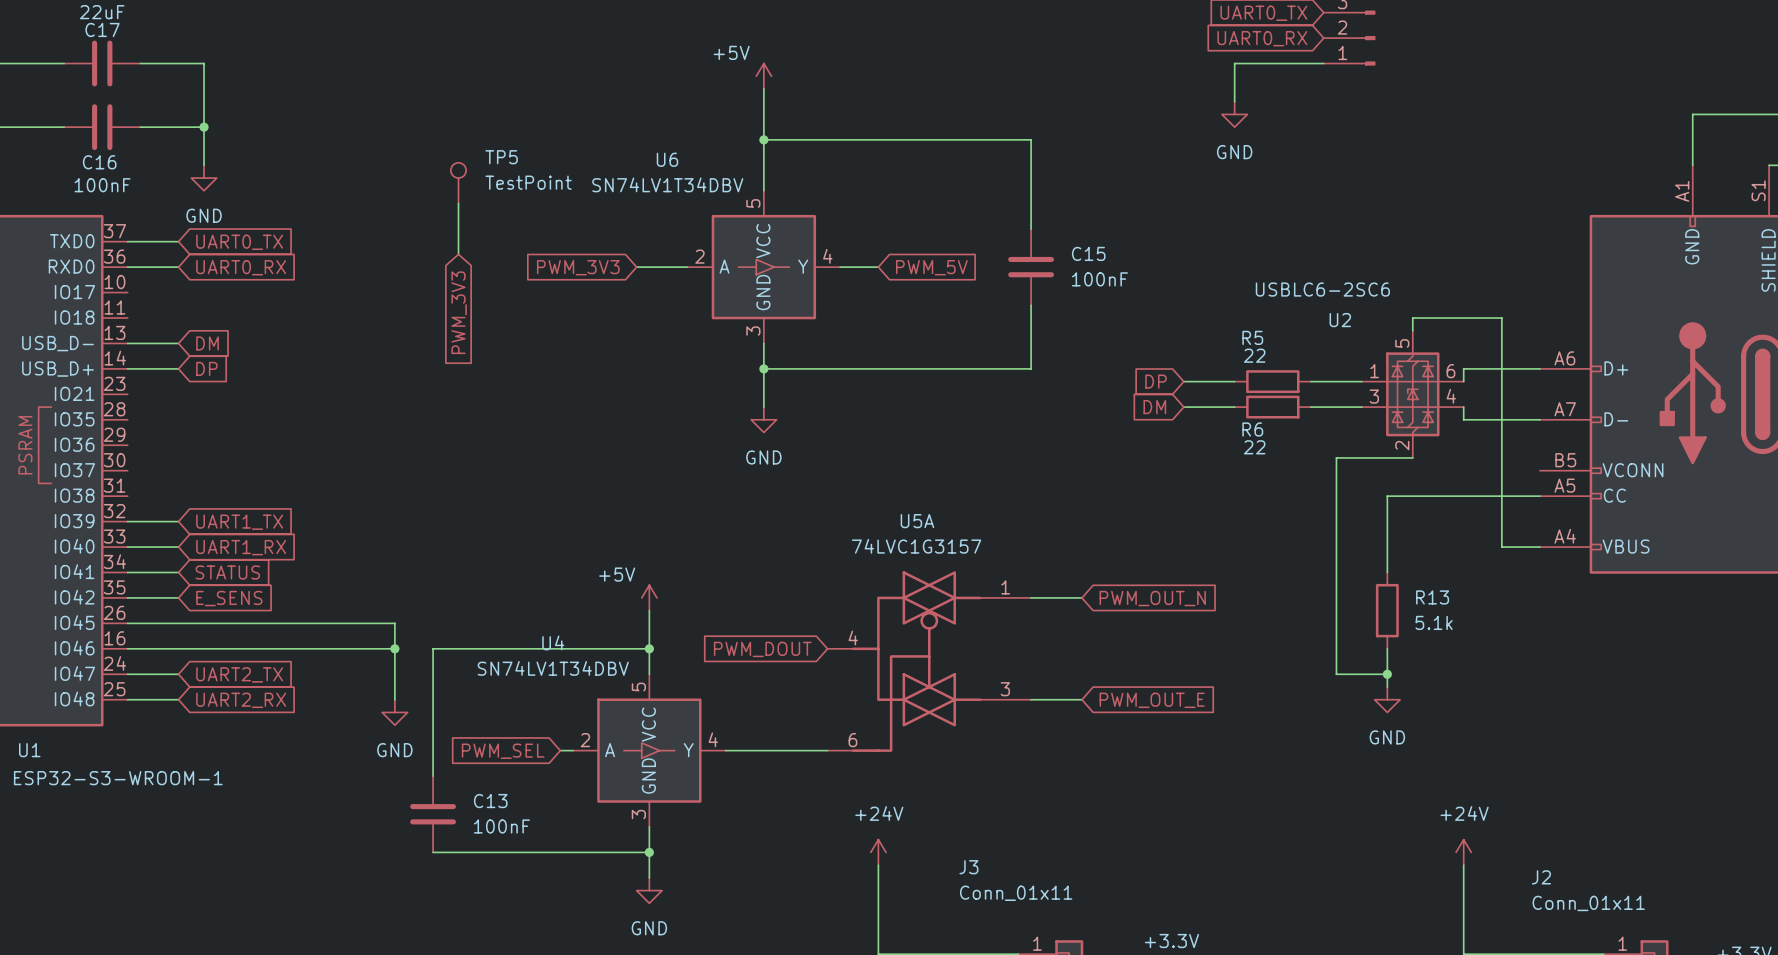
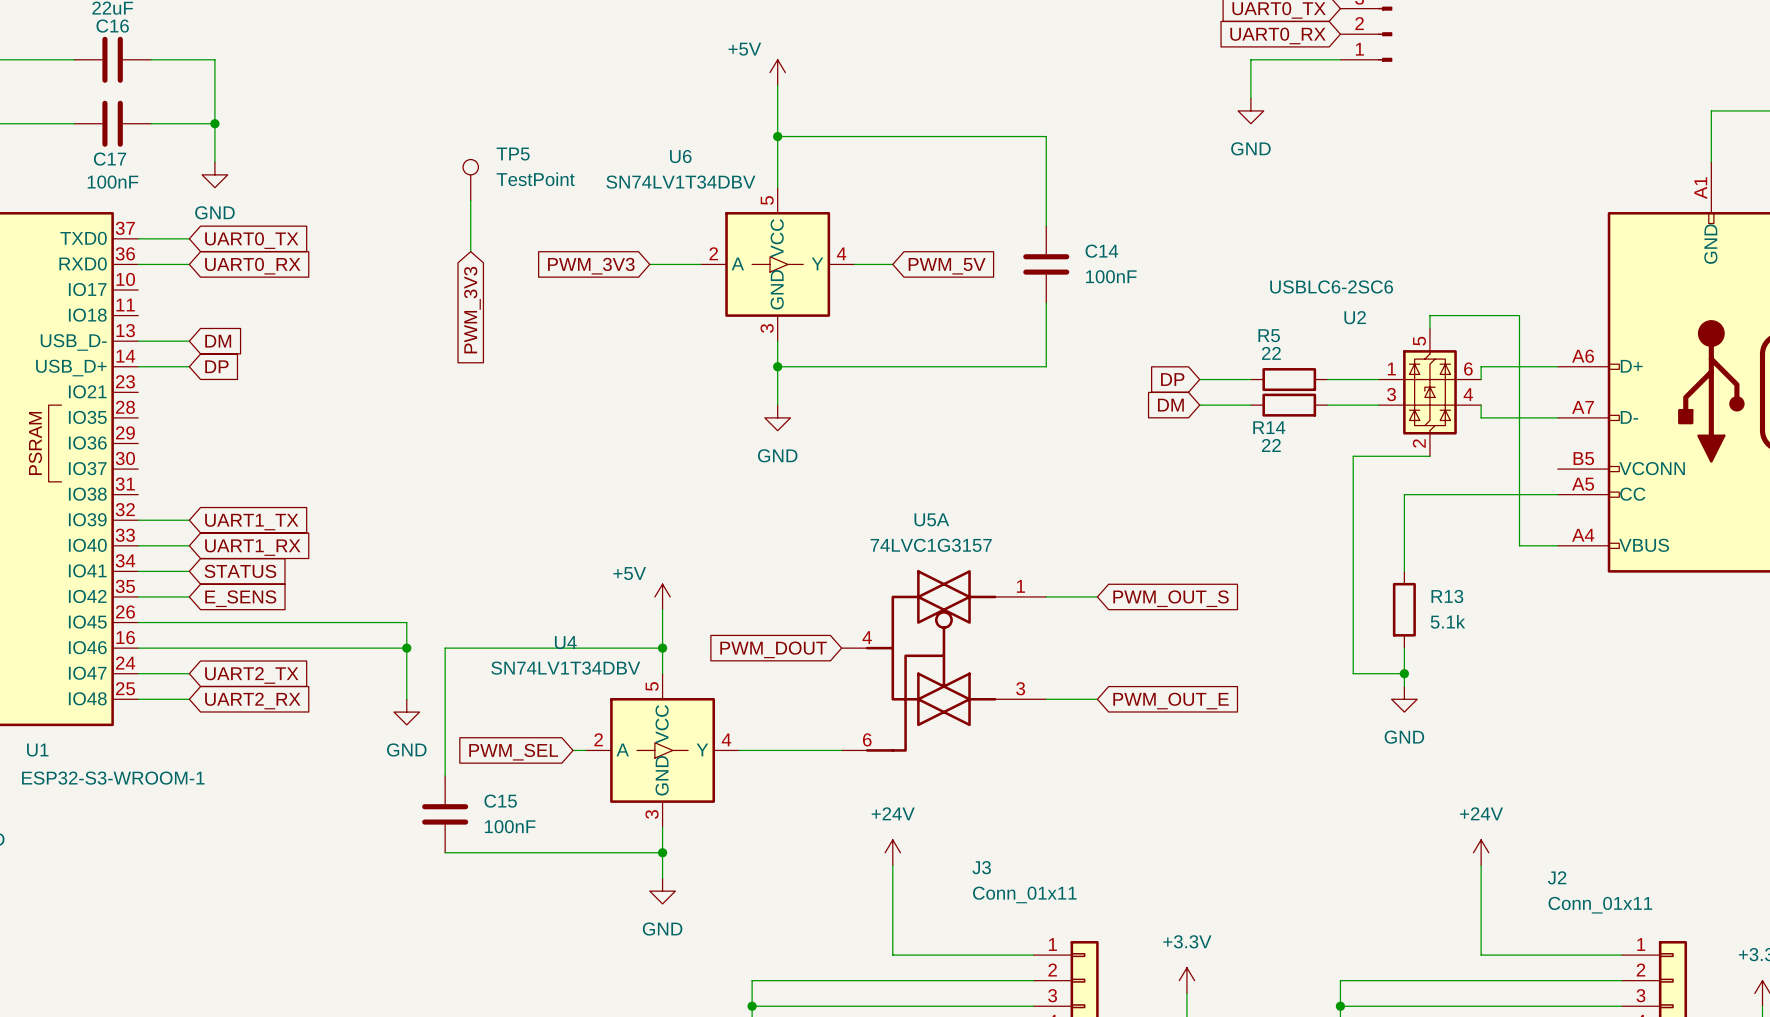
C17 name: C17 (102, 29) -> C16 (112, 26)
C16 name: C16 (99, 162) -> C17 (110, 159)
C15 name: C15 (1088, 253) -> C14 (1101, 251)
R6 name: R6 (1252, 429) -> R14 (1269, 427)
global label: PWM_OUT_N (1152, 598) -> PWM_OUT_S (1171, 598)
C13 name: C13 (490, 801) -> C15 (500, 801)

